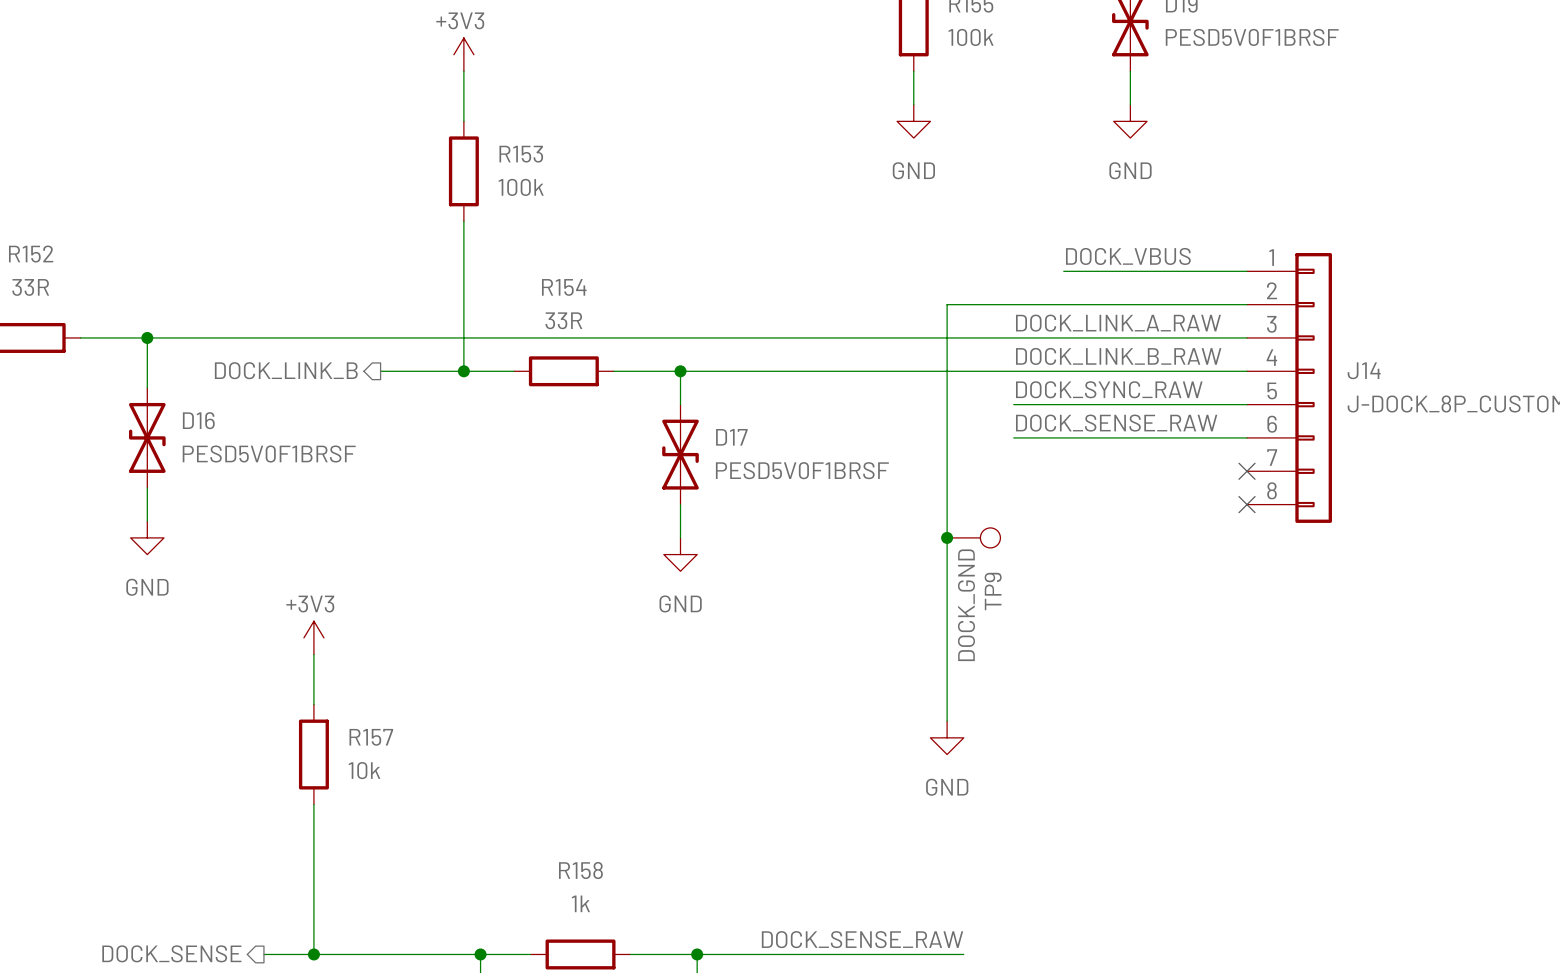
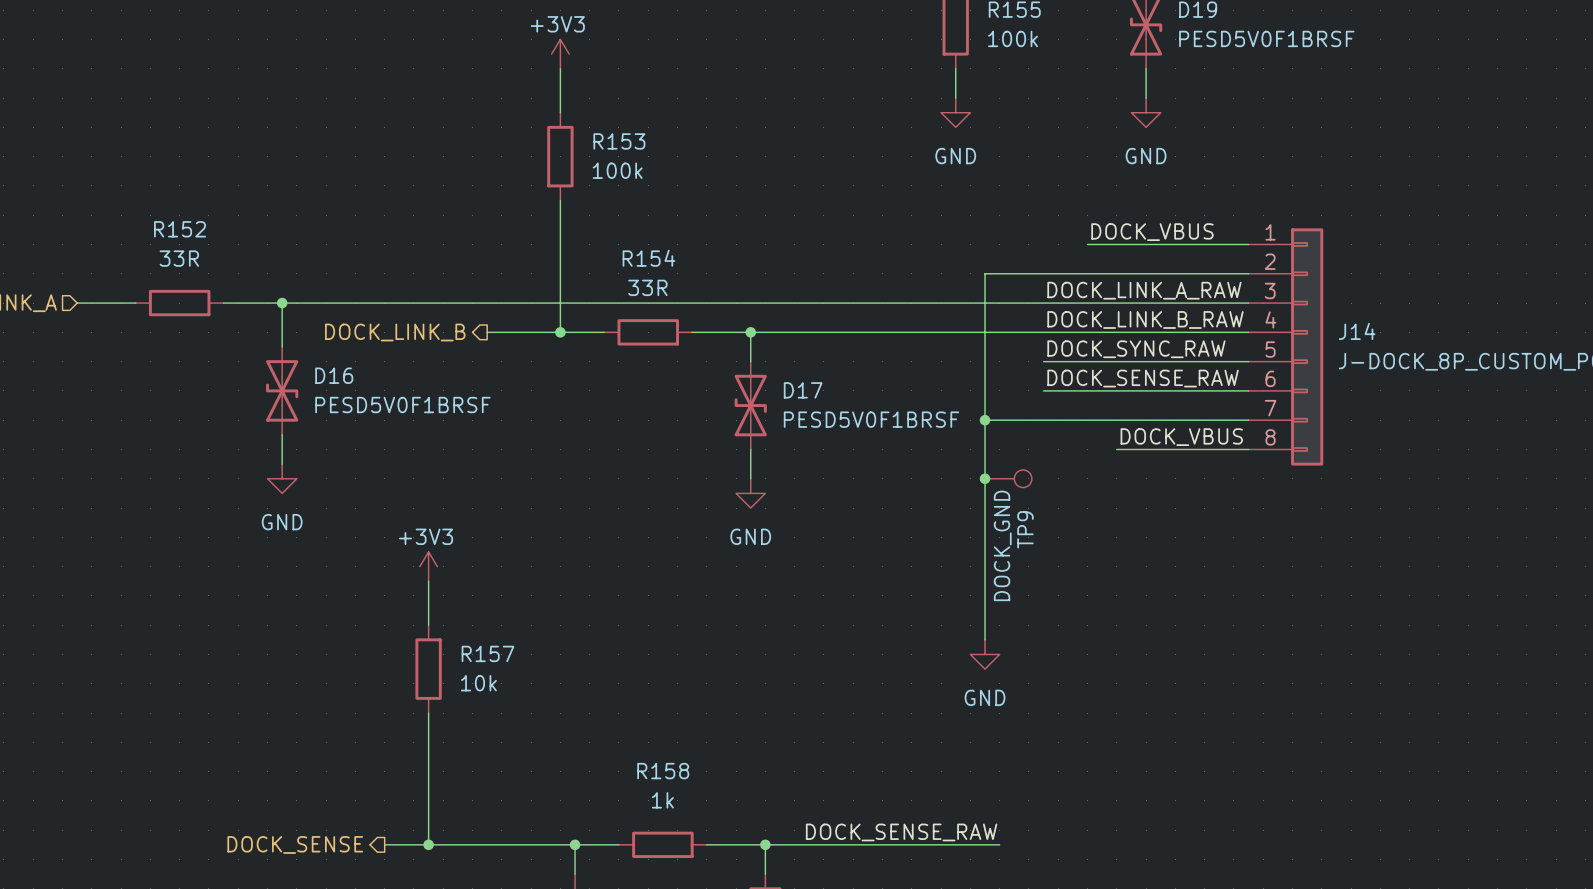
wire: none -> (985, 420) (1248, 420)
junction: none -> (985, 420)
no-connect mark: (1247, 471) -> none
label: none -> DOCK_VBUS (1181, 437)
wire: none -> (1116, 449) (1248, 449)
no-connect mark: (1247, 504) -> none

